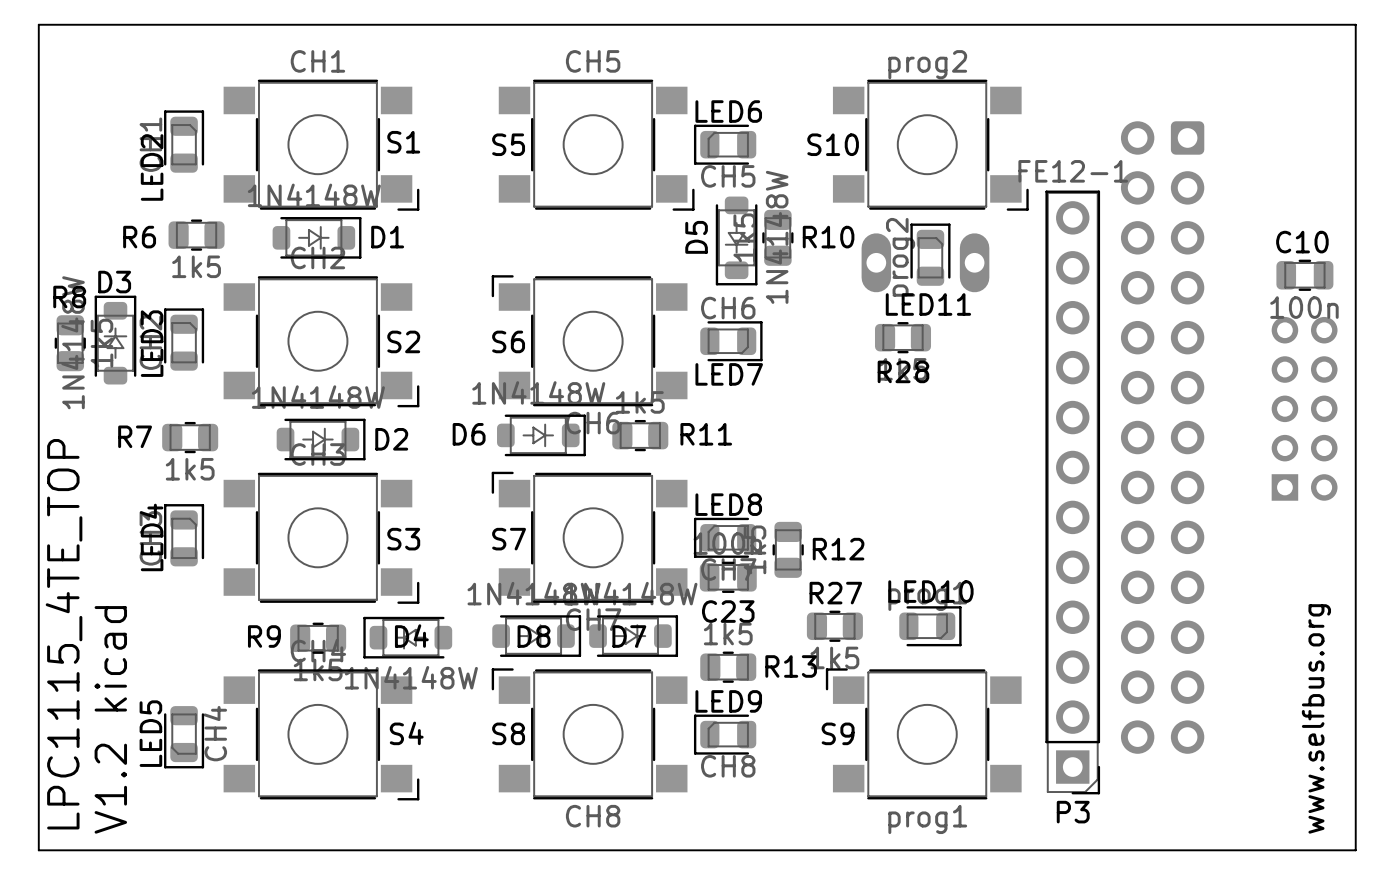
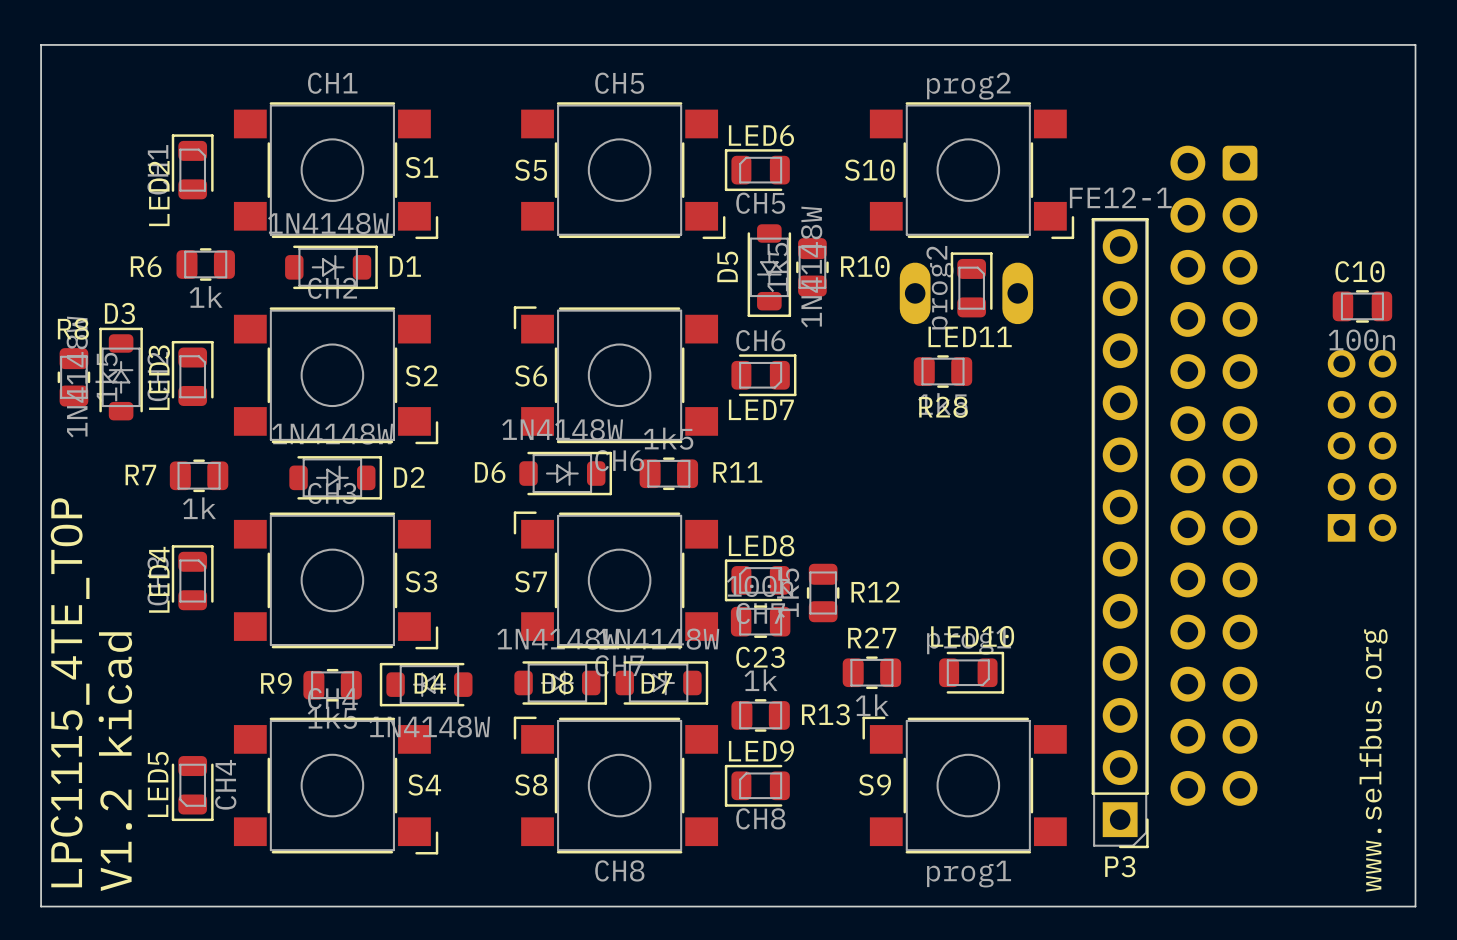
R6 value: 1k5 (196, 266) -> 1k (206, 296)
R7 value: 1k5 (190, 469) -> 1k (199, 508)
R13 value: 1k5 (728, 634) -> 1k (761, 680)
R27 value: 1k5 (834, 657) -> 1k (872, 705)

